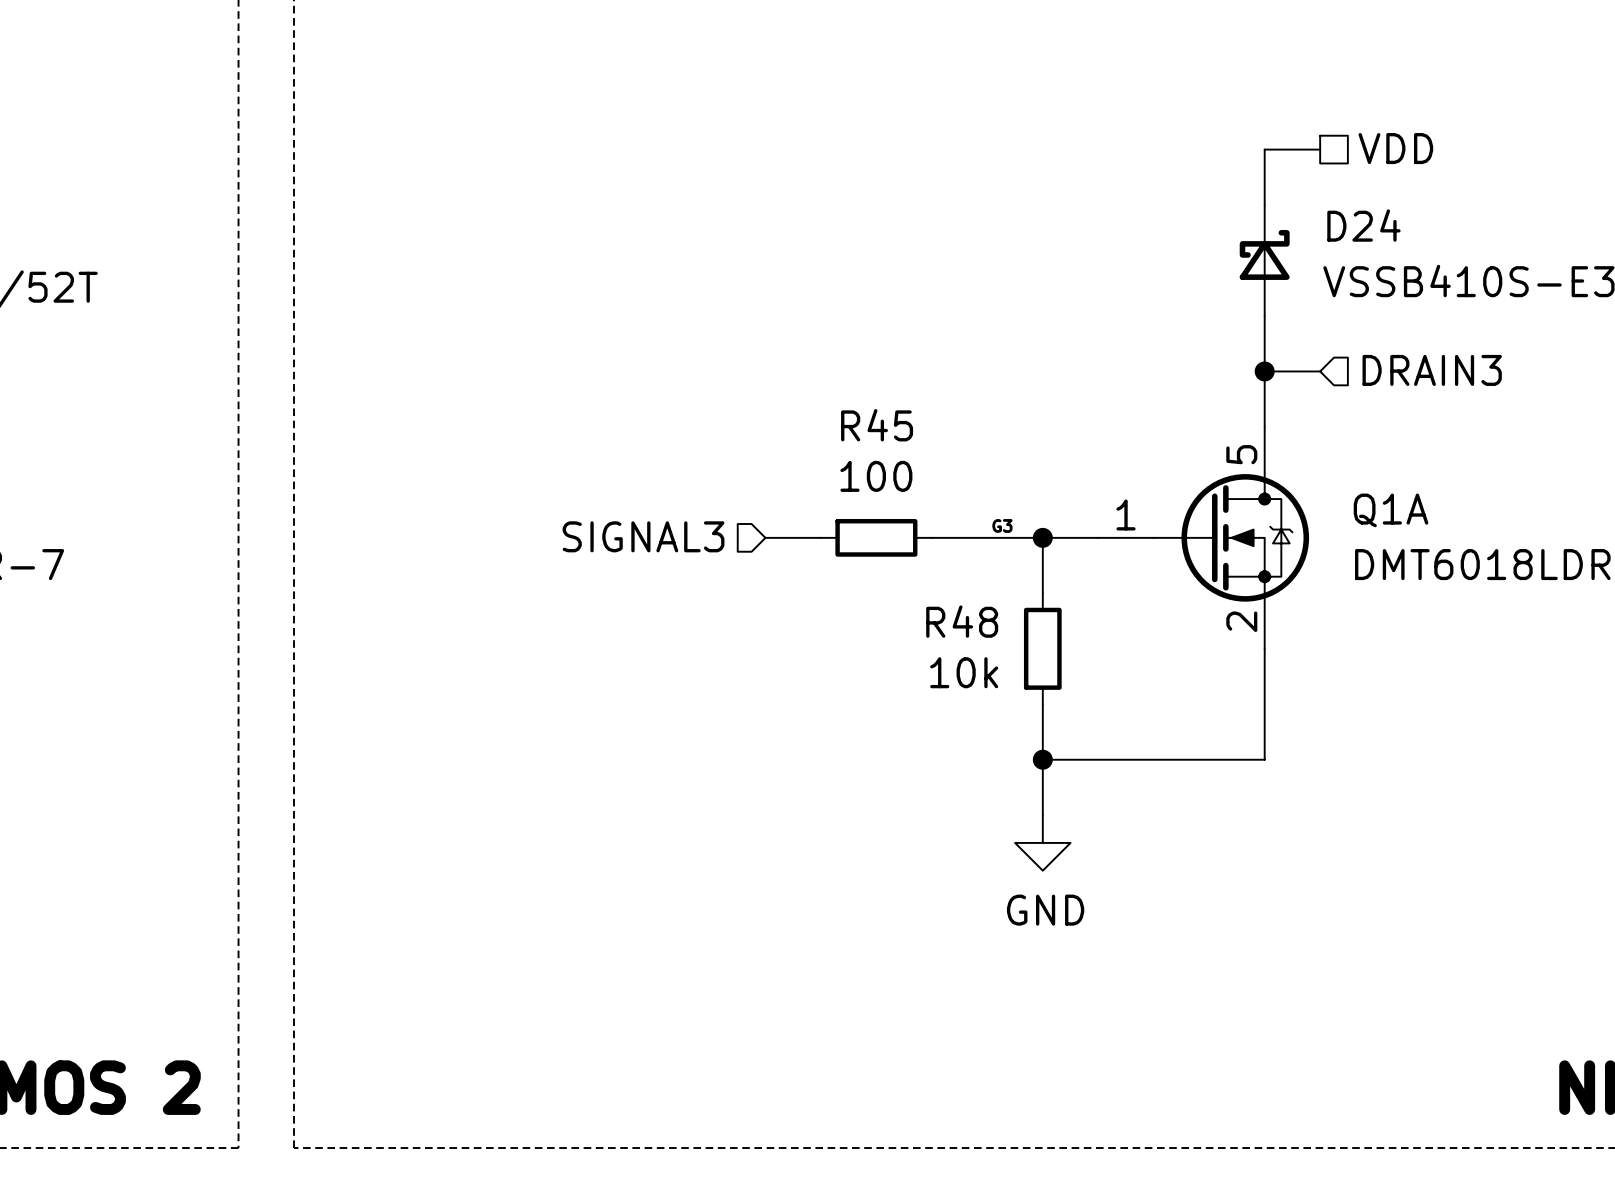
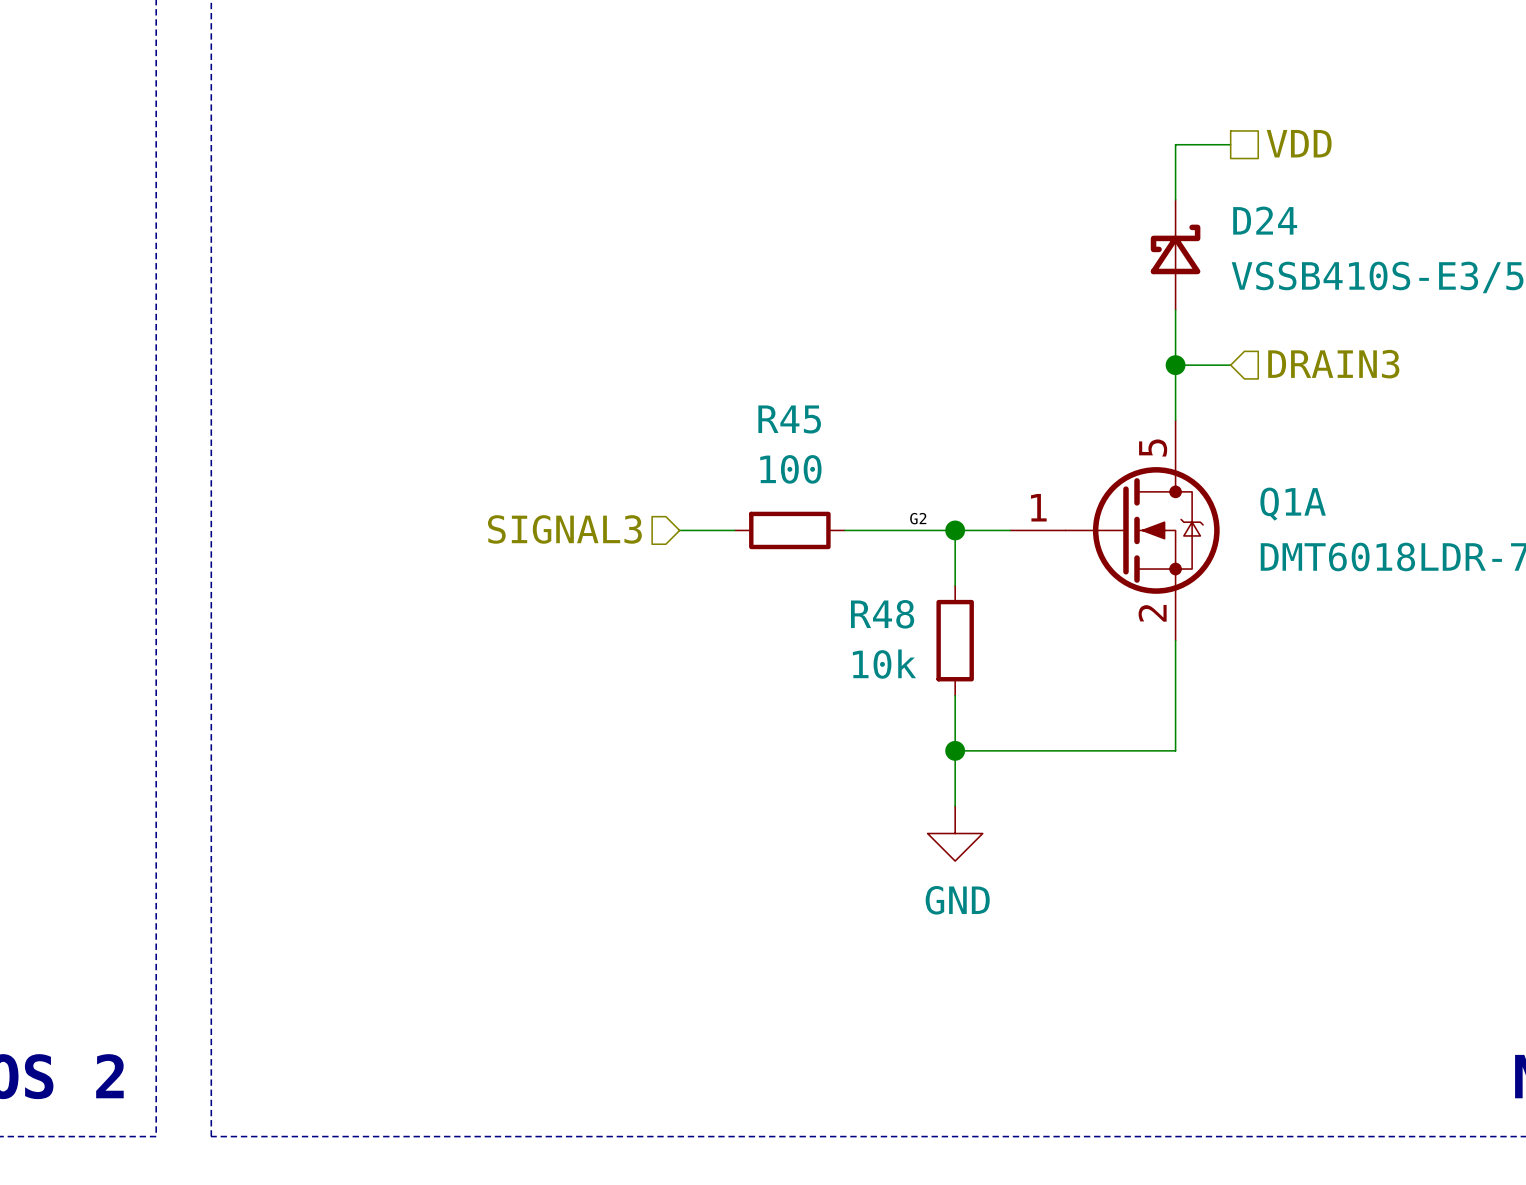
label: G3 (1002, 525) -> G2 (918, 518)

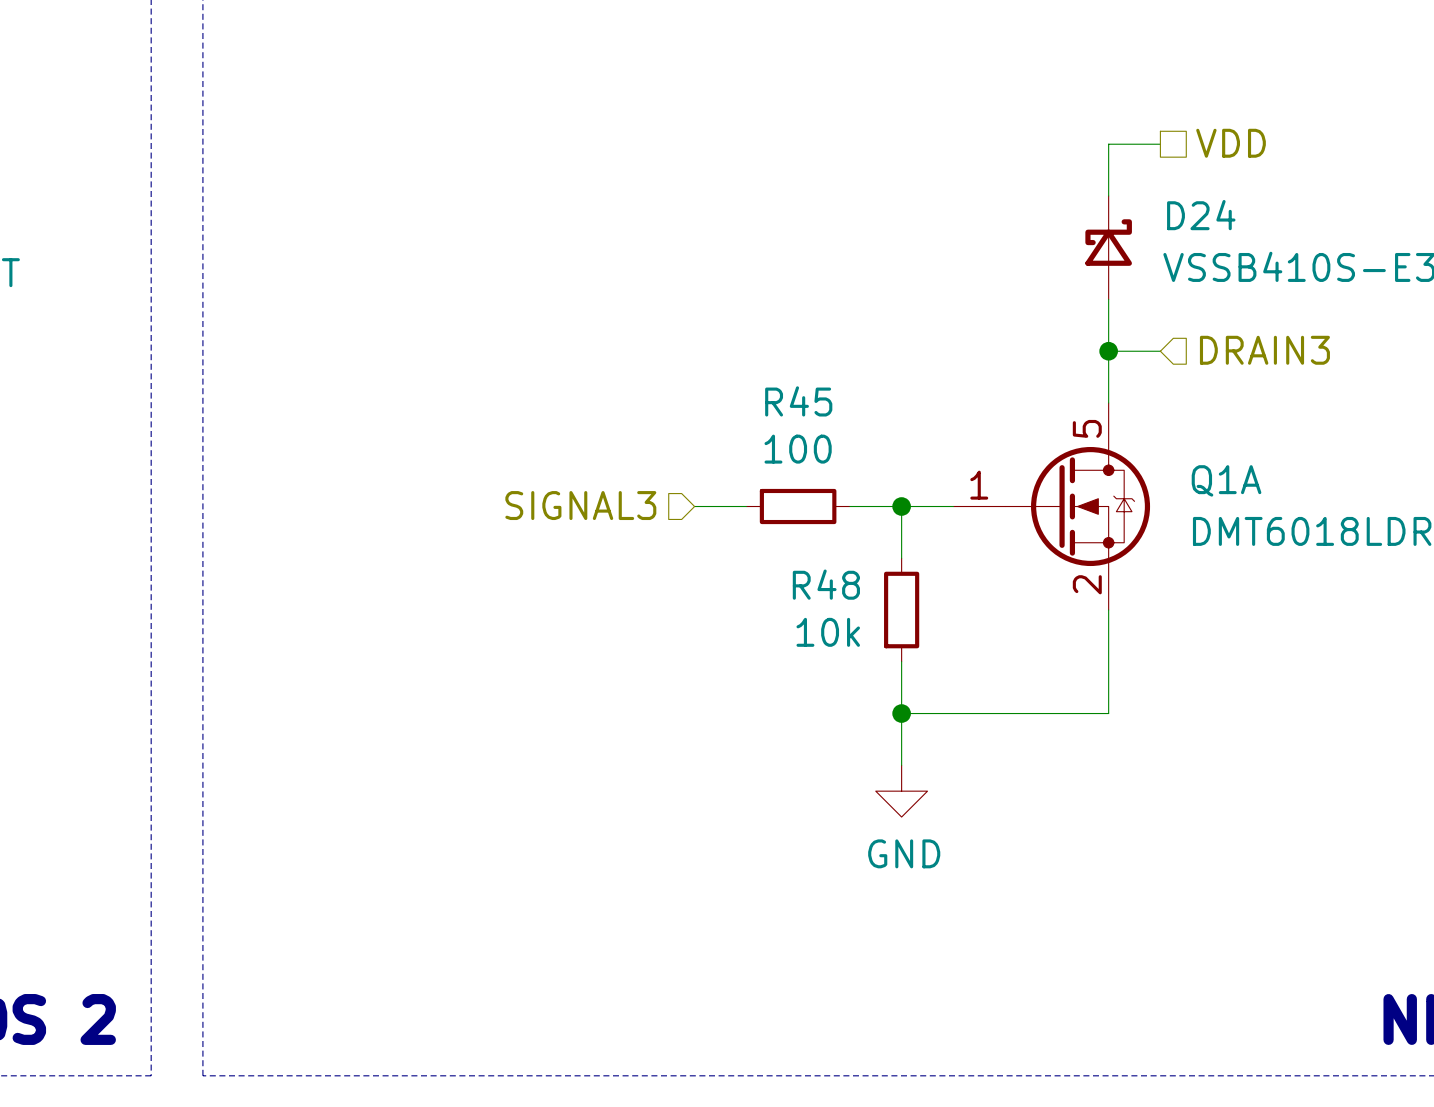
label: G2 (918, 518) -> none
hierarchical label position: SIGNAL3 (564, 529) -> SIGNAL3 (580, 505)
wire: (679, 530) (734, 530) -> (746, 506) (694, 506)
R45 position: (789, 530) -> (798, 506)
wire: (844, 530) (900, 530) -> none

